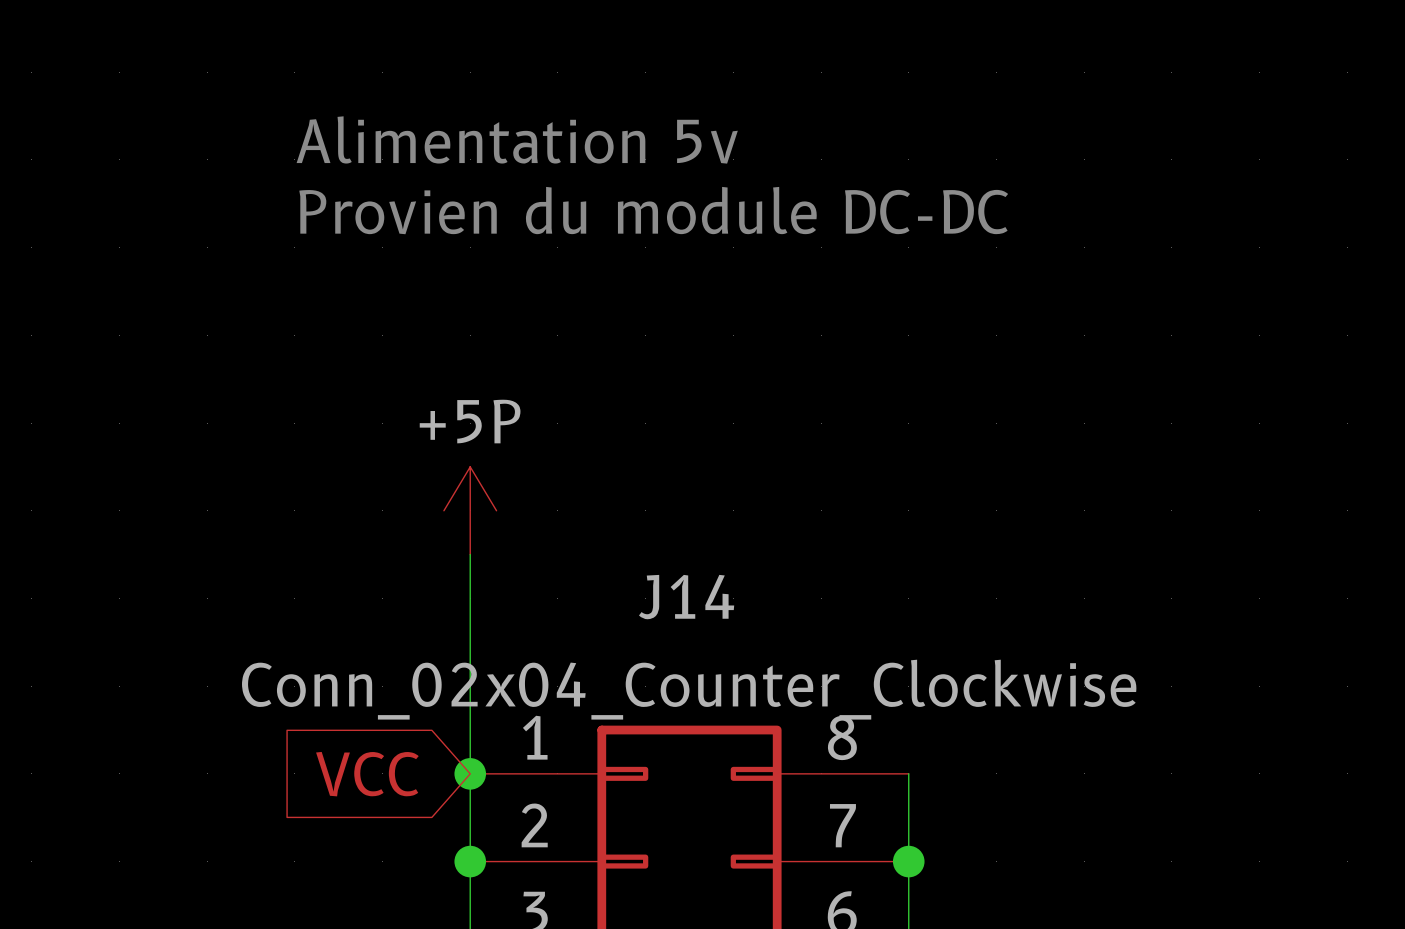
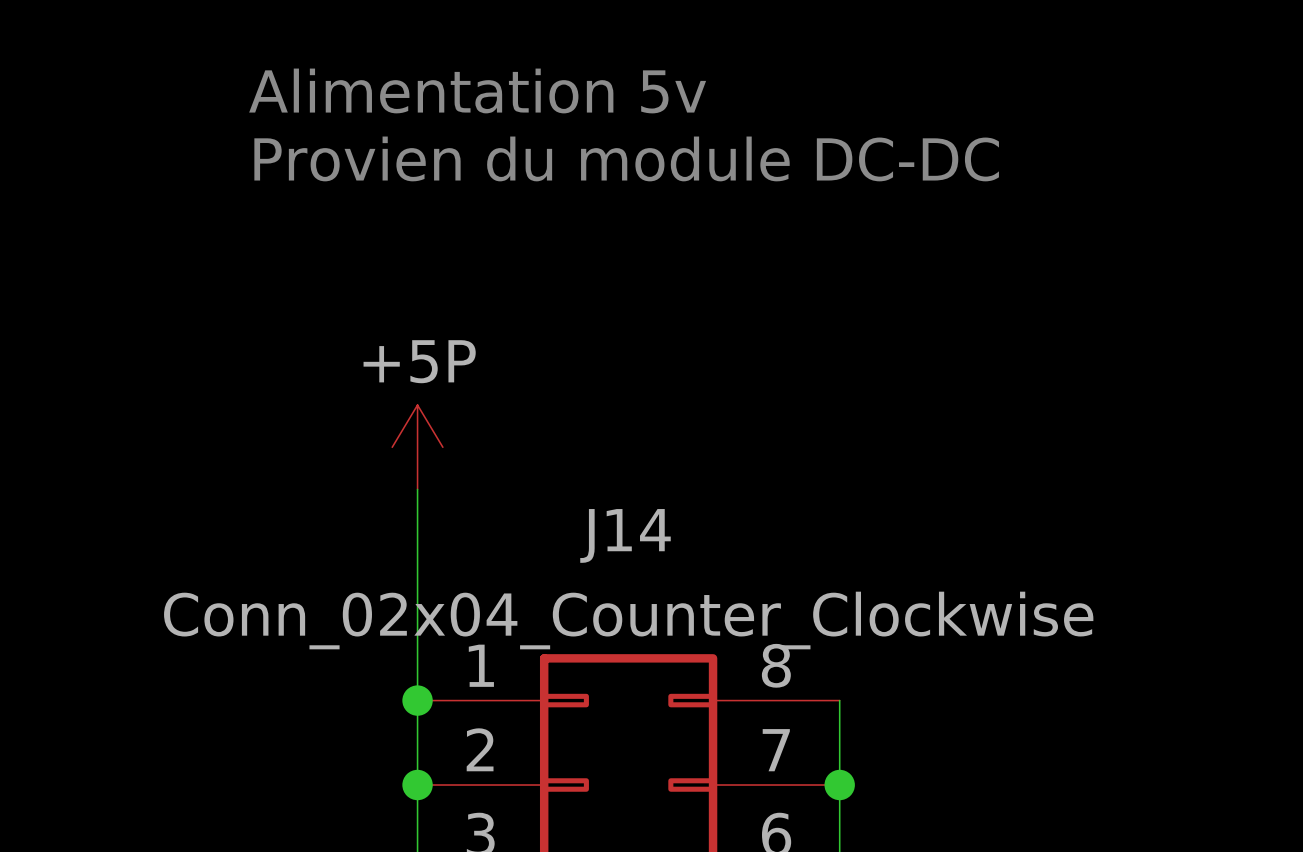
global label: VCC (367, 774) -> none

